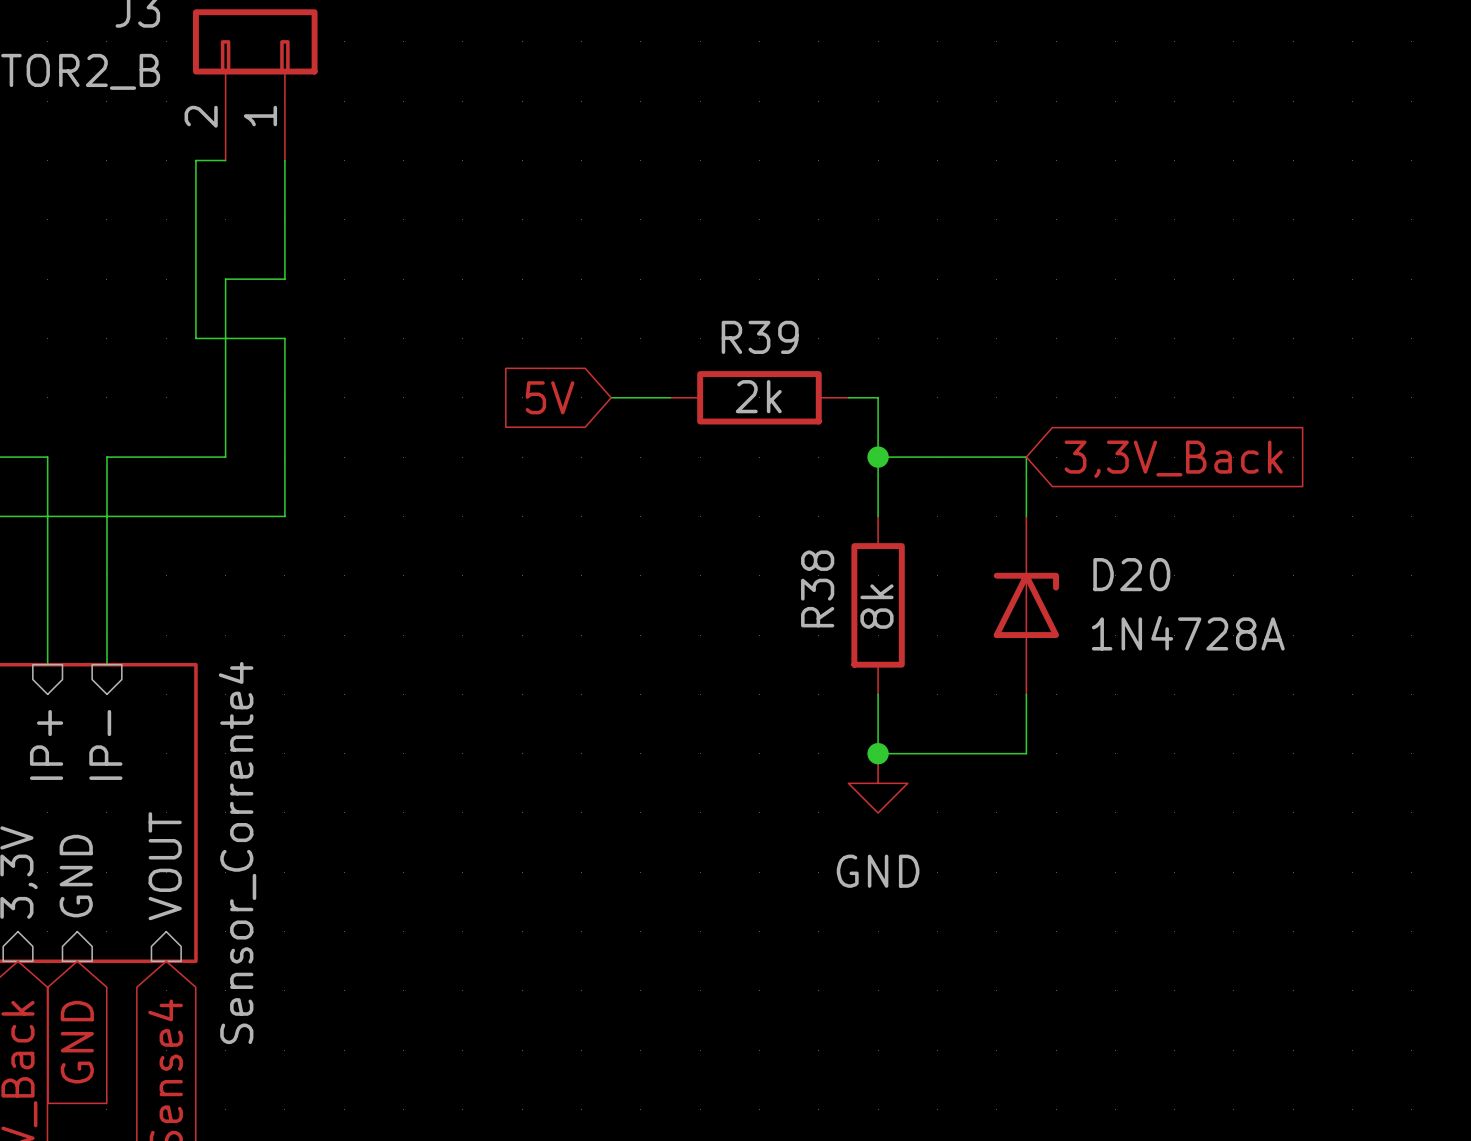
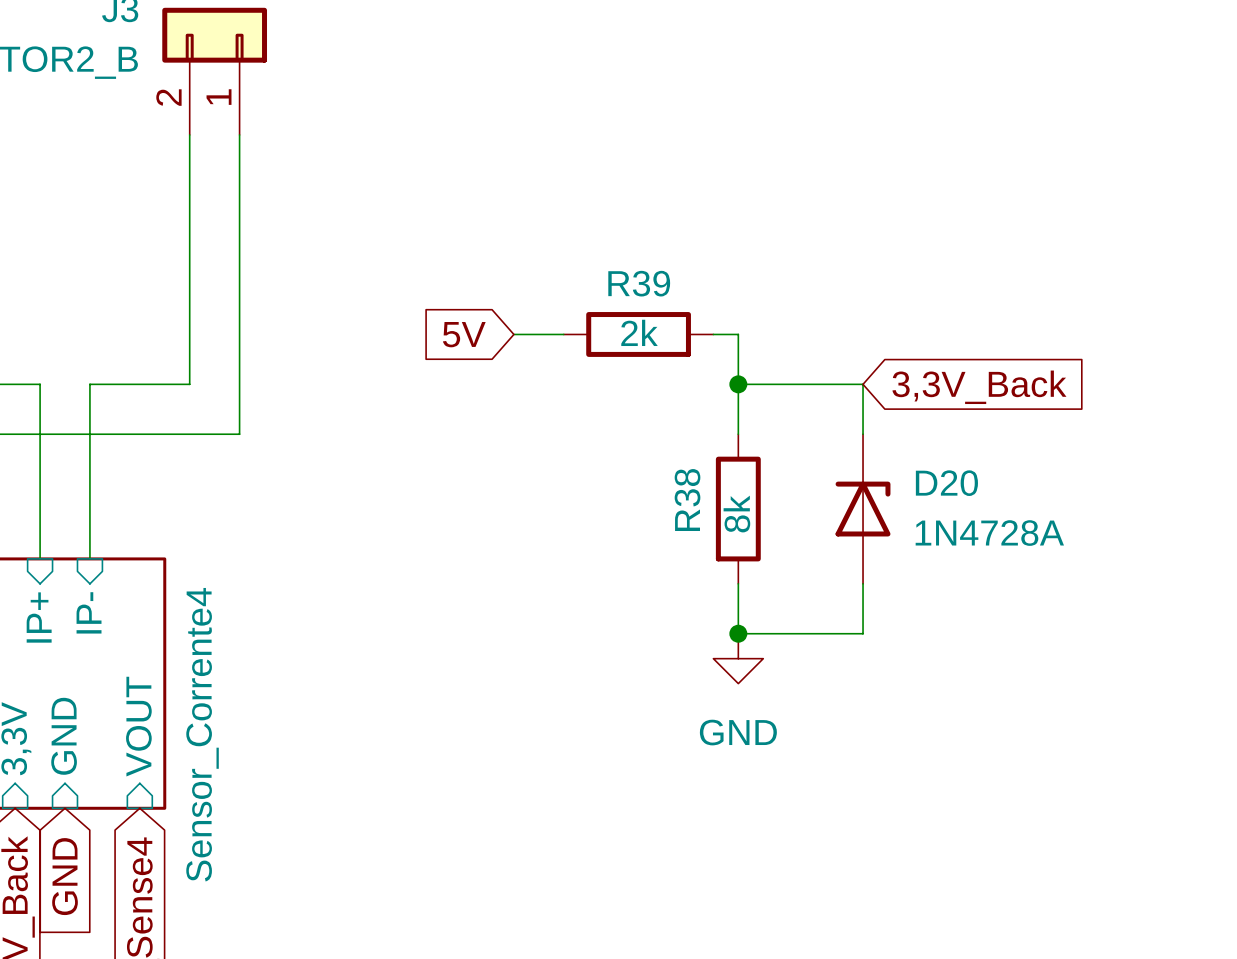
wire: (225, 160) (195, 160) (195, 338) (284, 338) -> (189, 134) (189, 234)
wire: (225, 279) (284, 279) -> (239, 284) (239, 234)

